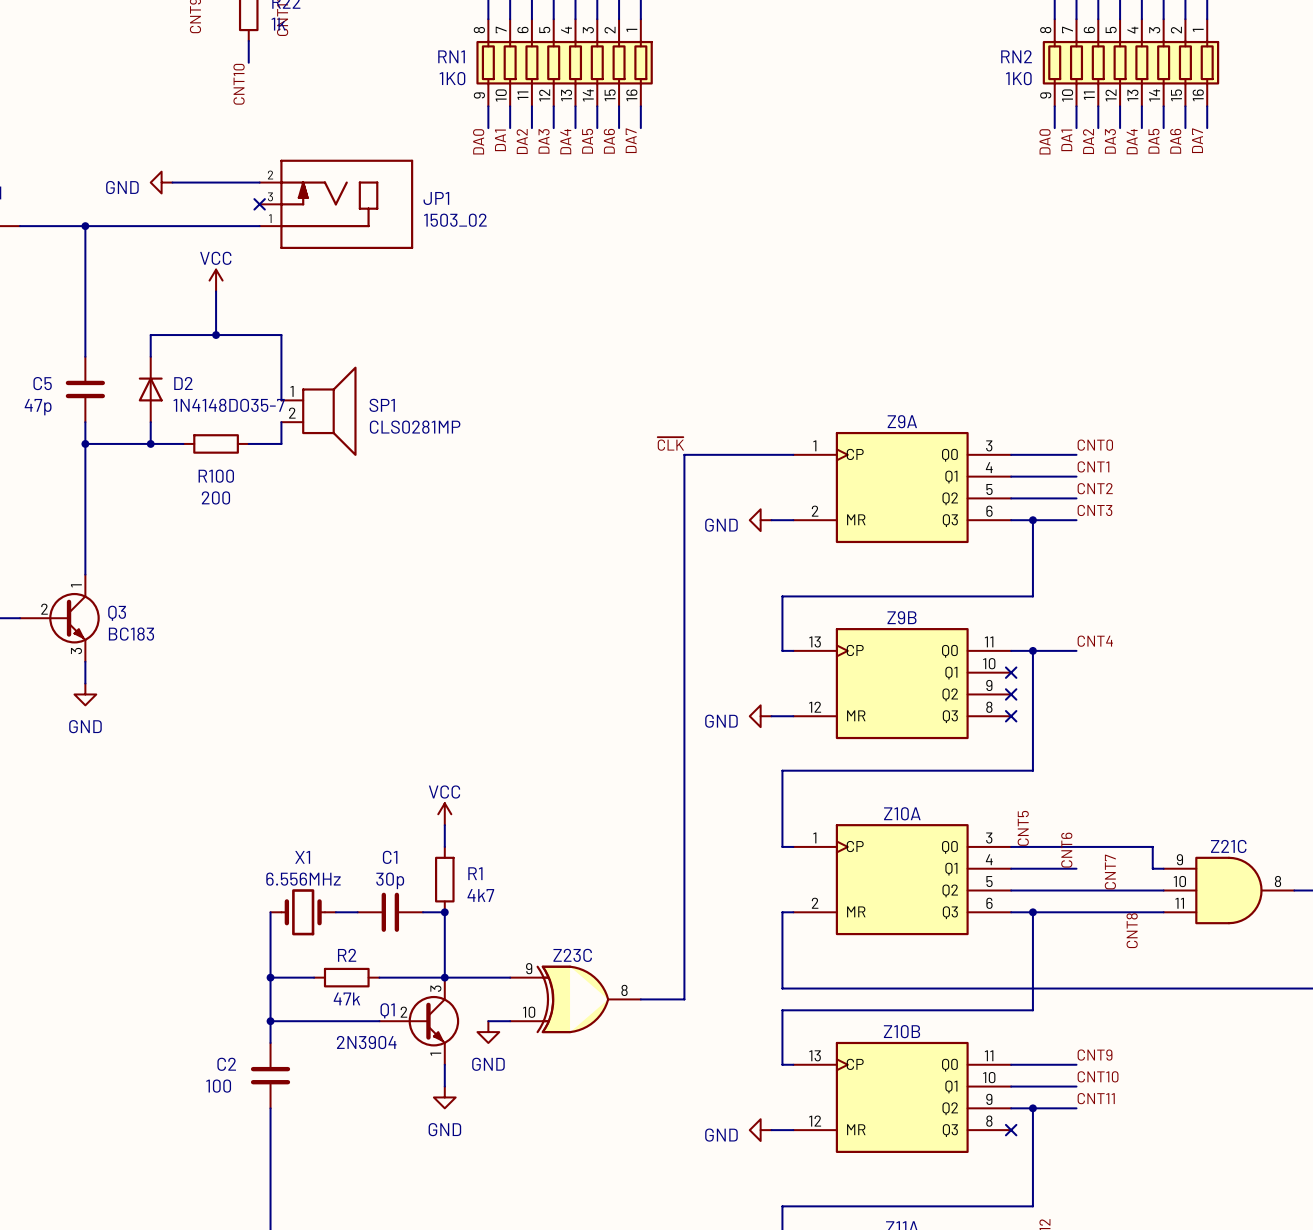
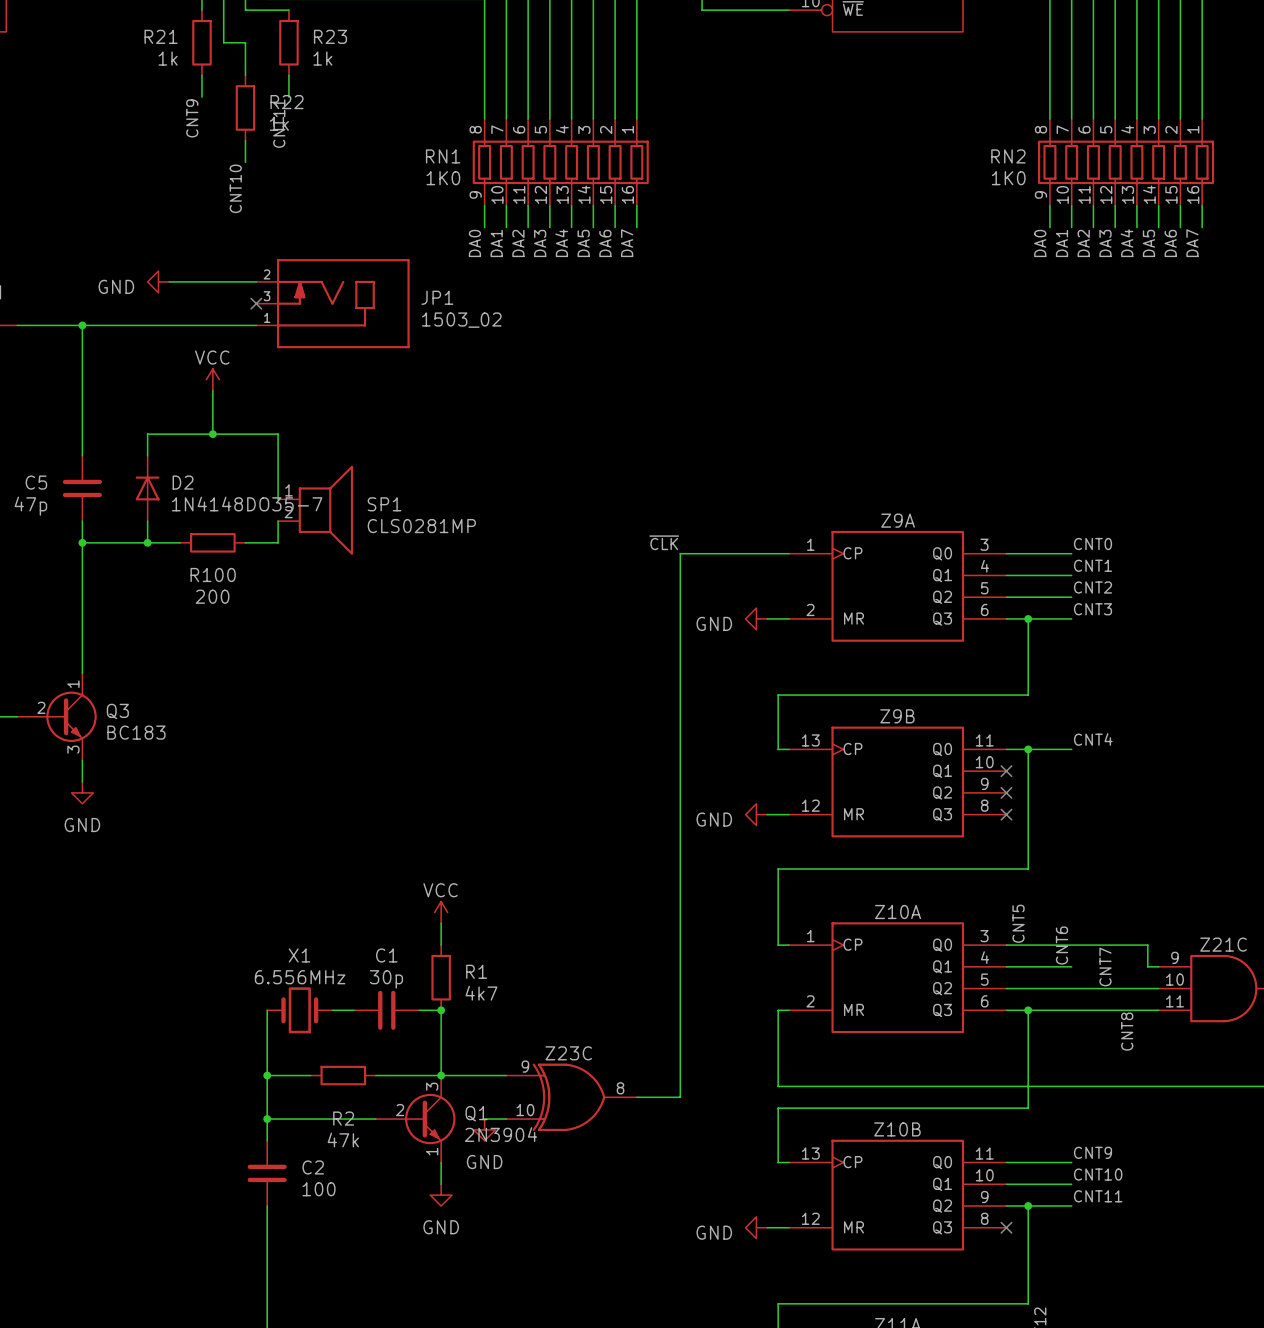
R2 name position: R2 (347, 955) -> R2 (343, 1118)
R2 value position: 47k (346, 998) -> 47k (343, 1139)
Q1 name position: Q1 (387, 1010) -> Q1 (476, 1113)
Q1 value position: 2N3904 (366, 1042) -> 2N3904 (501, 1134)
C2 name position: C2 (226, 1064) -> C2 (313, 1167)
C2 value position: 100 (218, 1086) -> 100 (319, 1189)

